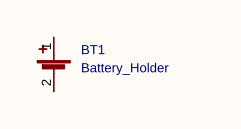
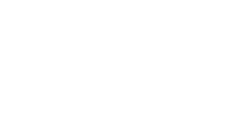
BT1: Battery_Holder (53, 64) -> none

